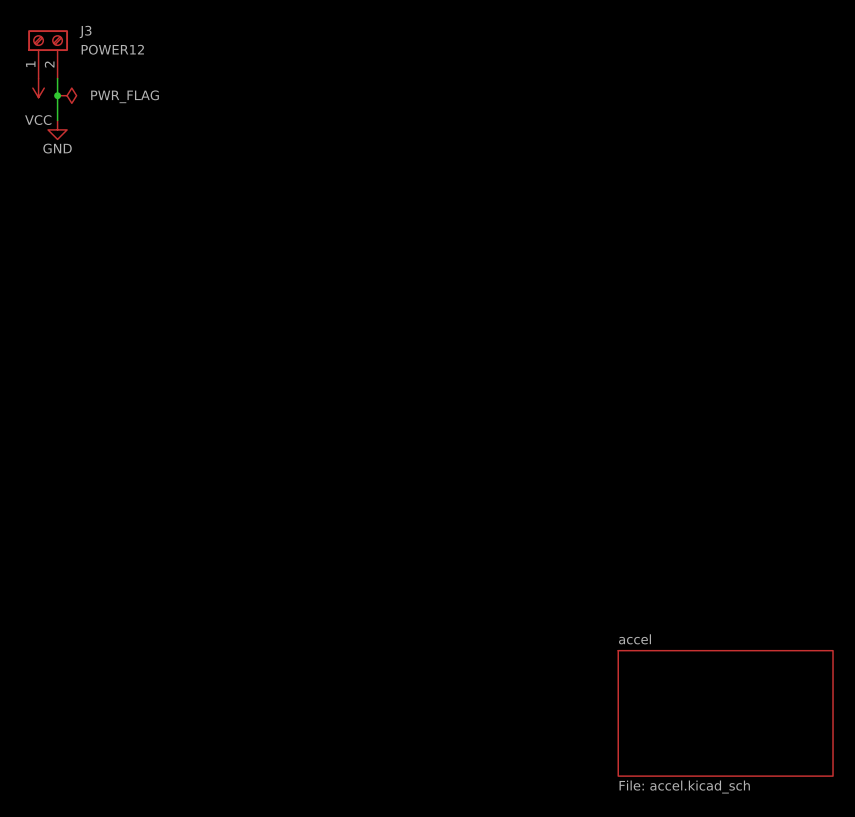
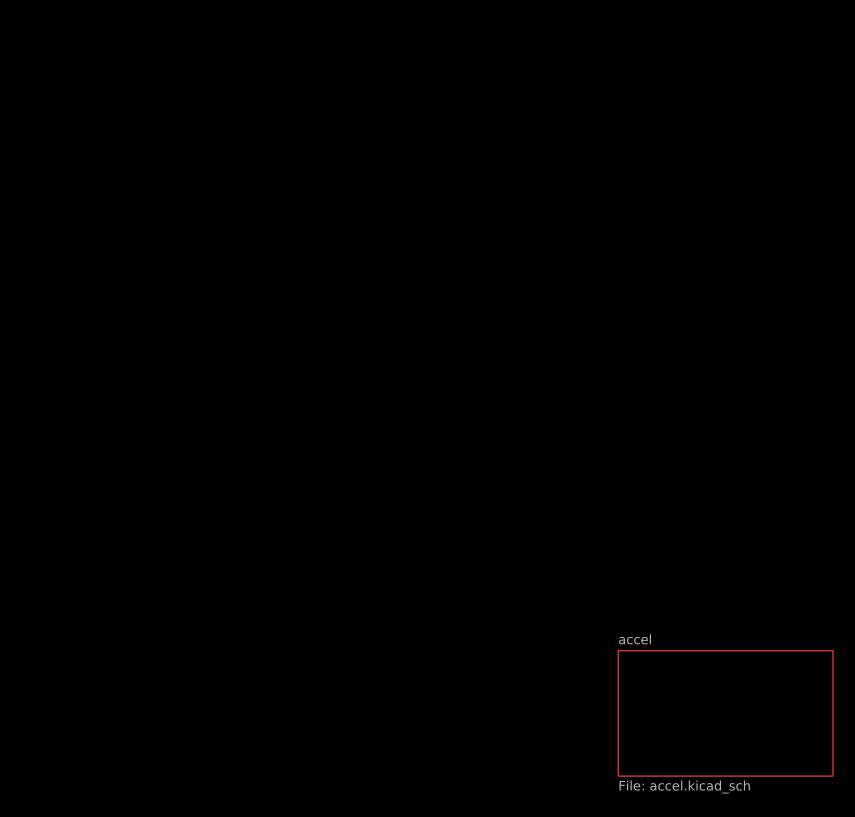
J3: POWER12 (48, 54) -> none
wire: (57, 78) (57, 120) -> none
power symbol: VCC (38, 88) -> none
junction: (57, 95) -> none
power symbol: PWR_FLAG (67, 95) -> none
power symbol: GND (57, 129) -> none

